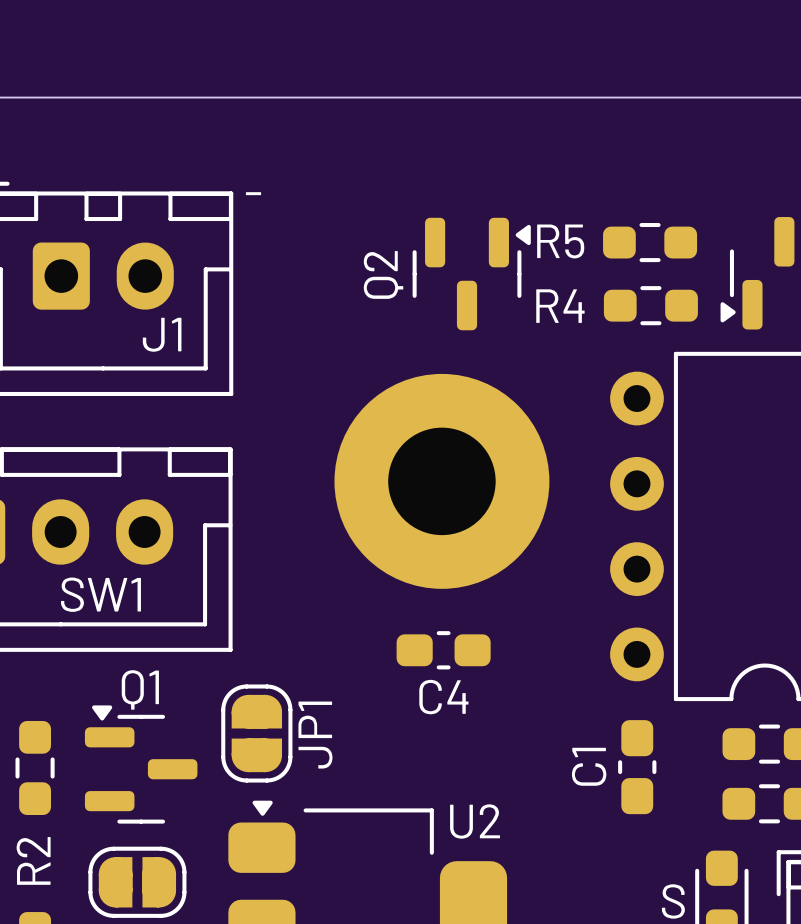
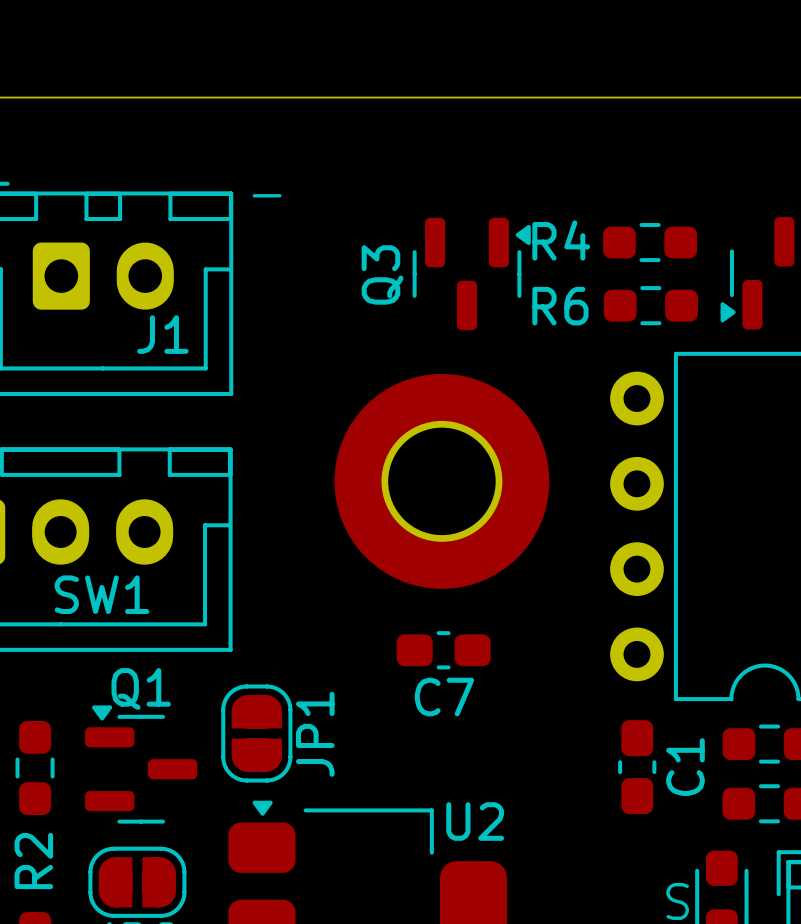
R5 name: R5 (560, 241) -> R4 (561, 240)
Q2 name: Q2 (383, 274) -> Q3 (382, 274)
R4 name: R4 (560, 306) -> R6 (560, 306)
C4 name: C4 (443, 697) -> C7 (444, 697)
C1 name position: C1 (589, 766) -> C1 (685, 767)

